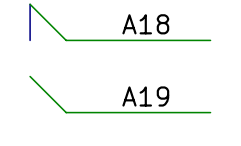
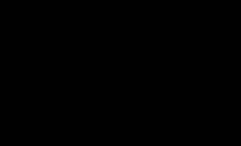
wire: (30, 4) (66, 40) (210, 40) -> none
bus: (30, 4) (30, 40) -> none
label: A18 (145, 24) -> none
wire: (30, 76) (66, 112) (210, 112) -> none
label: A19 (145, 96) -> none

